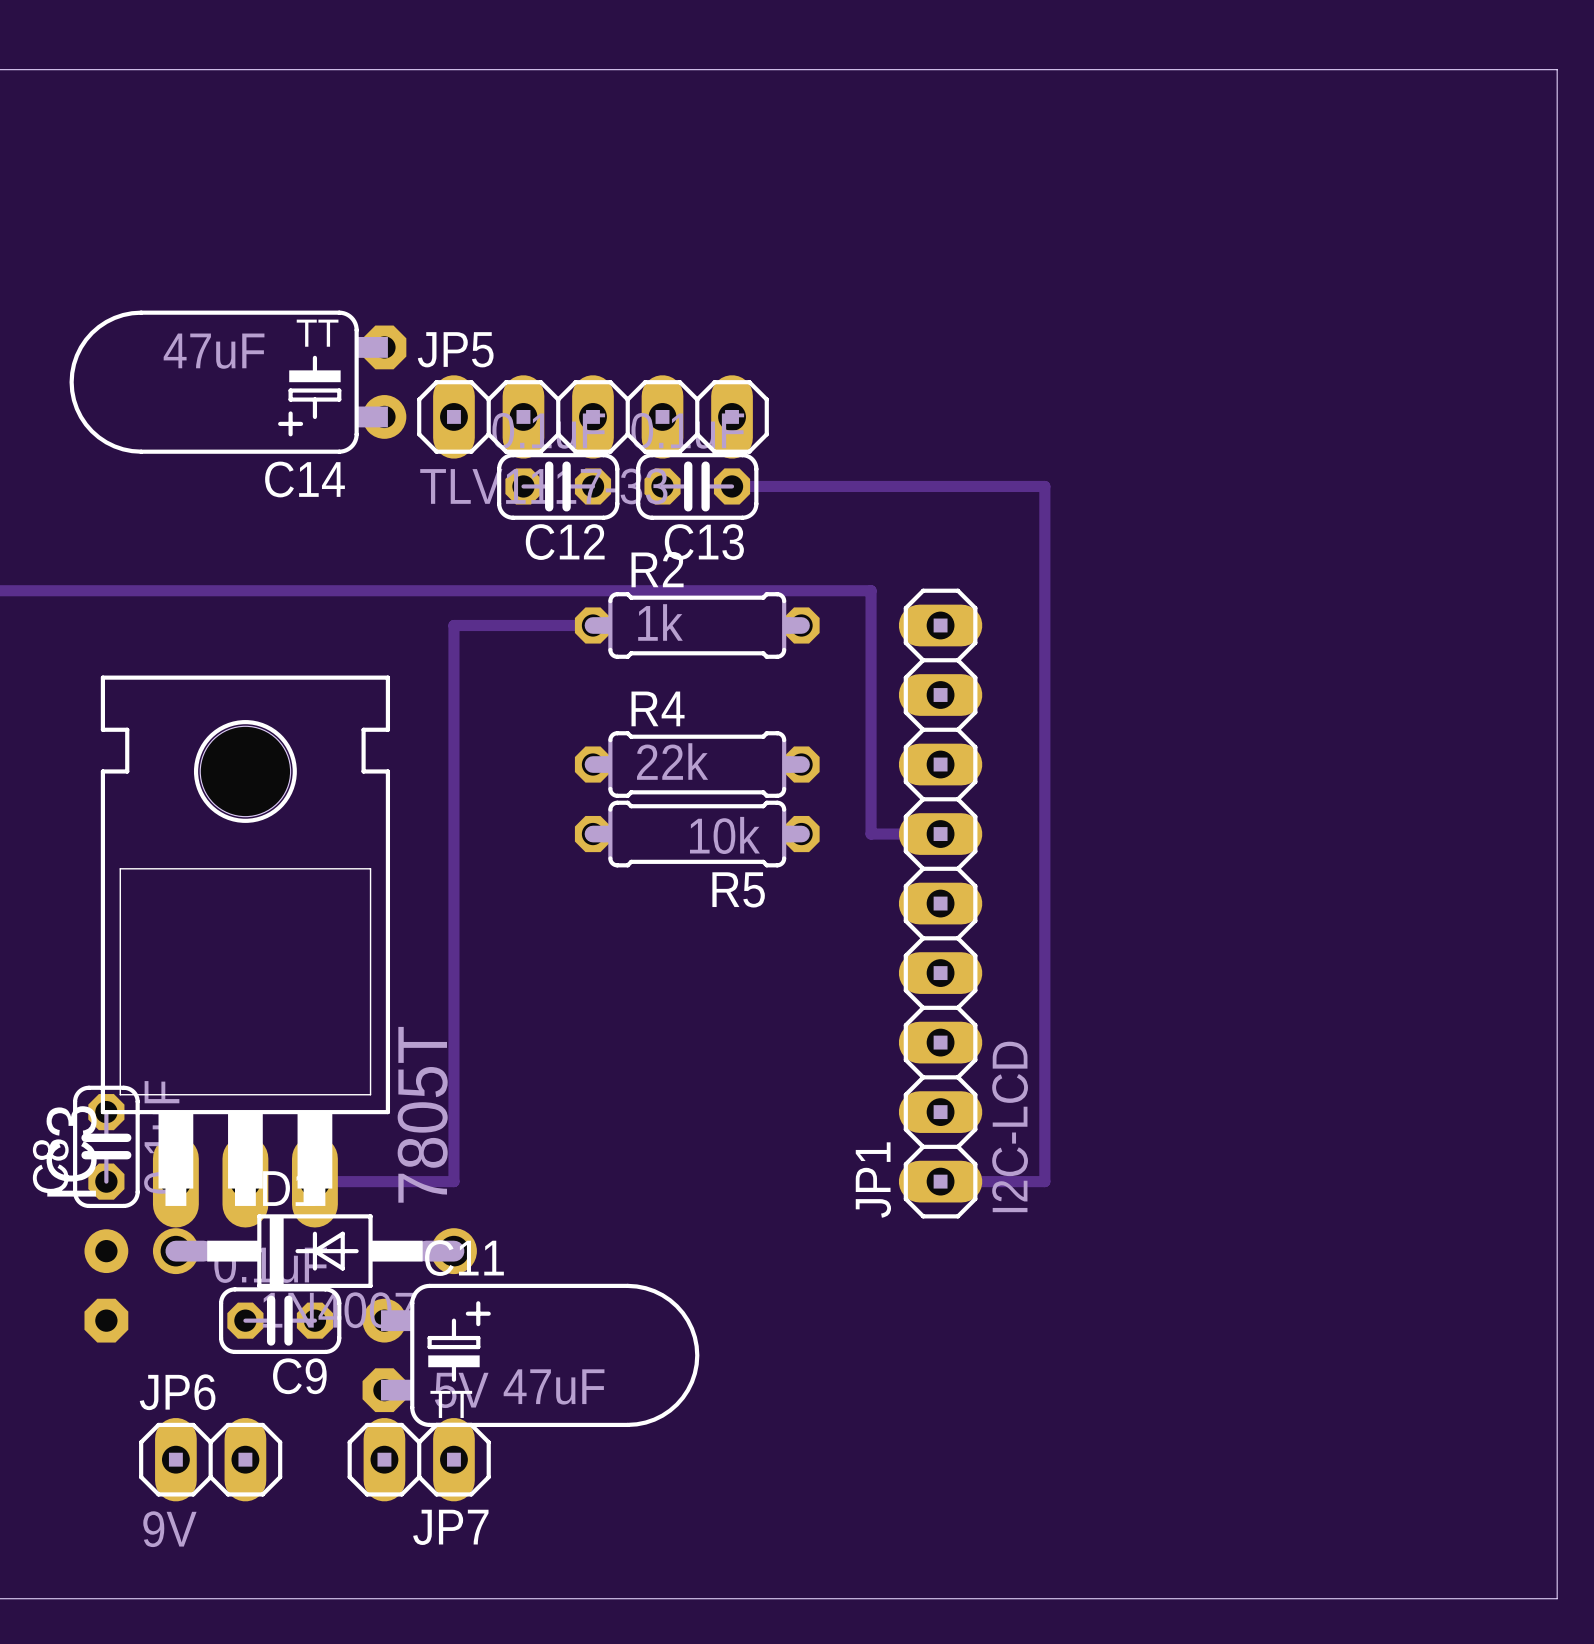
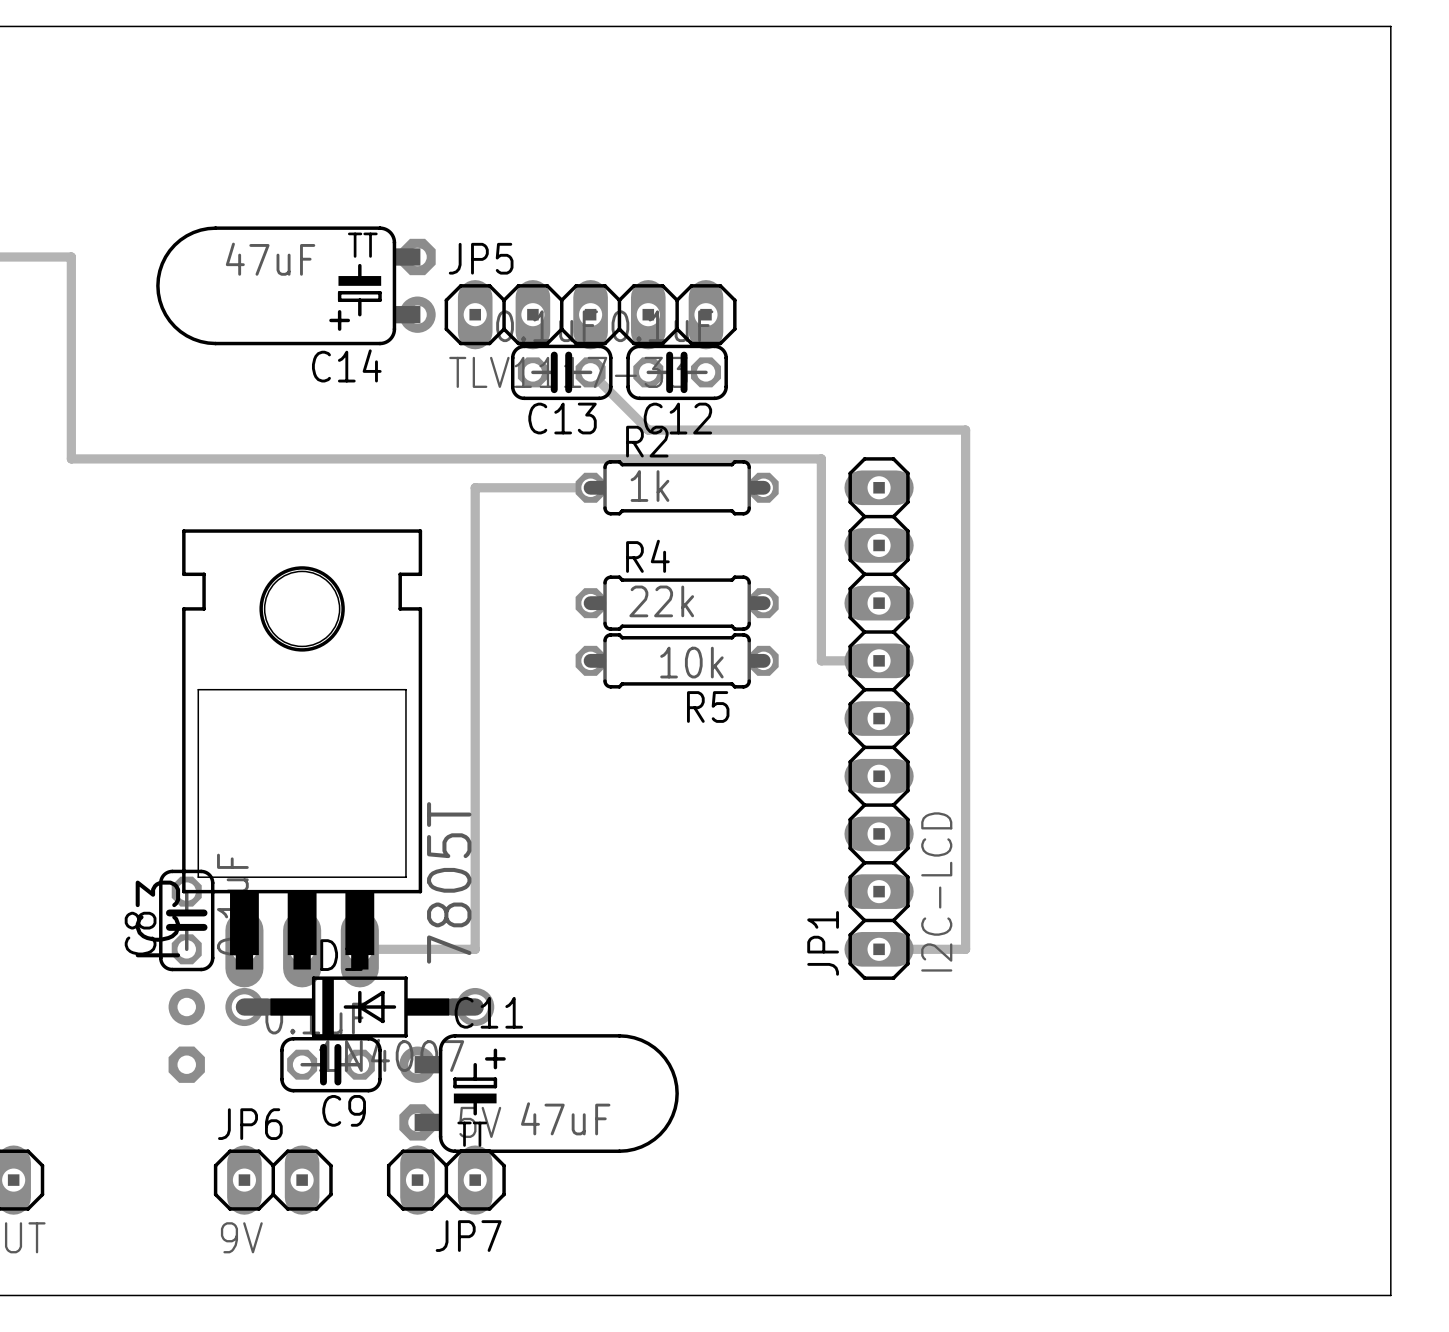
track: (732, 486) (1044, 486) (1044, 555) -> (590, 372) (648, 430) (965, 430)
C12 name: C12 (565, 542) -> C13 (562, 418)
C13 name: C13 (704, 542) -> C12 (677, 418)

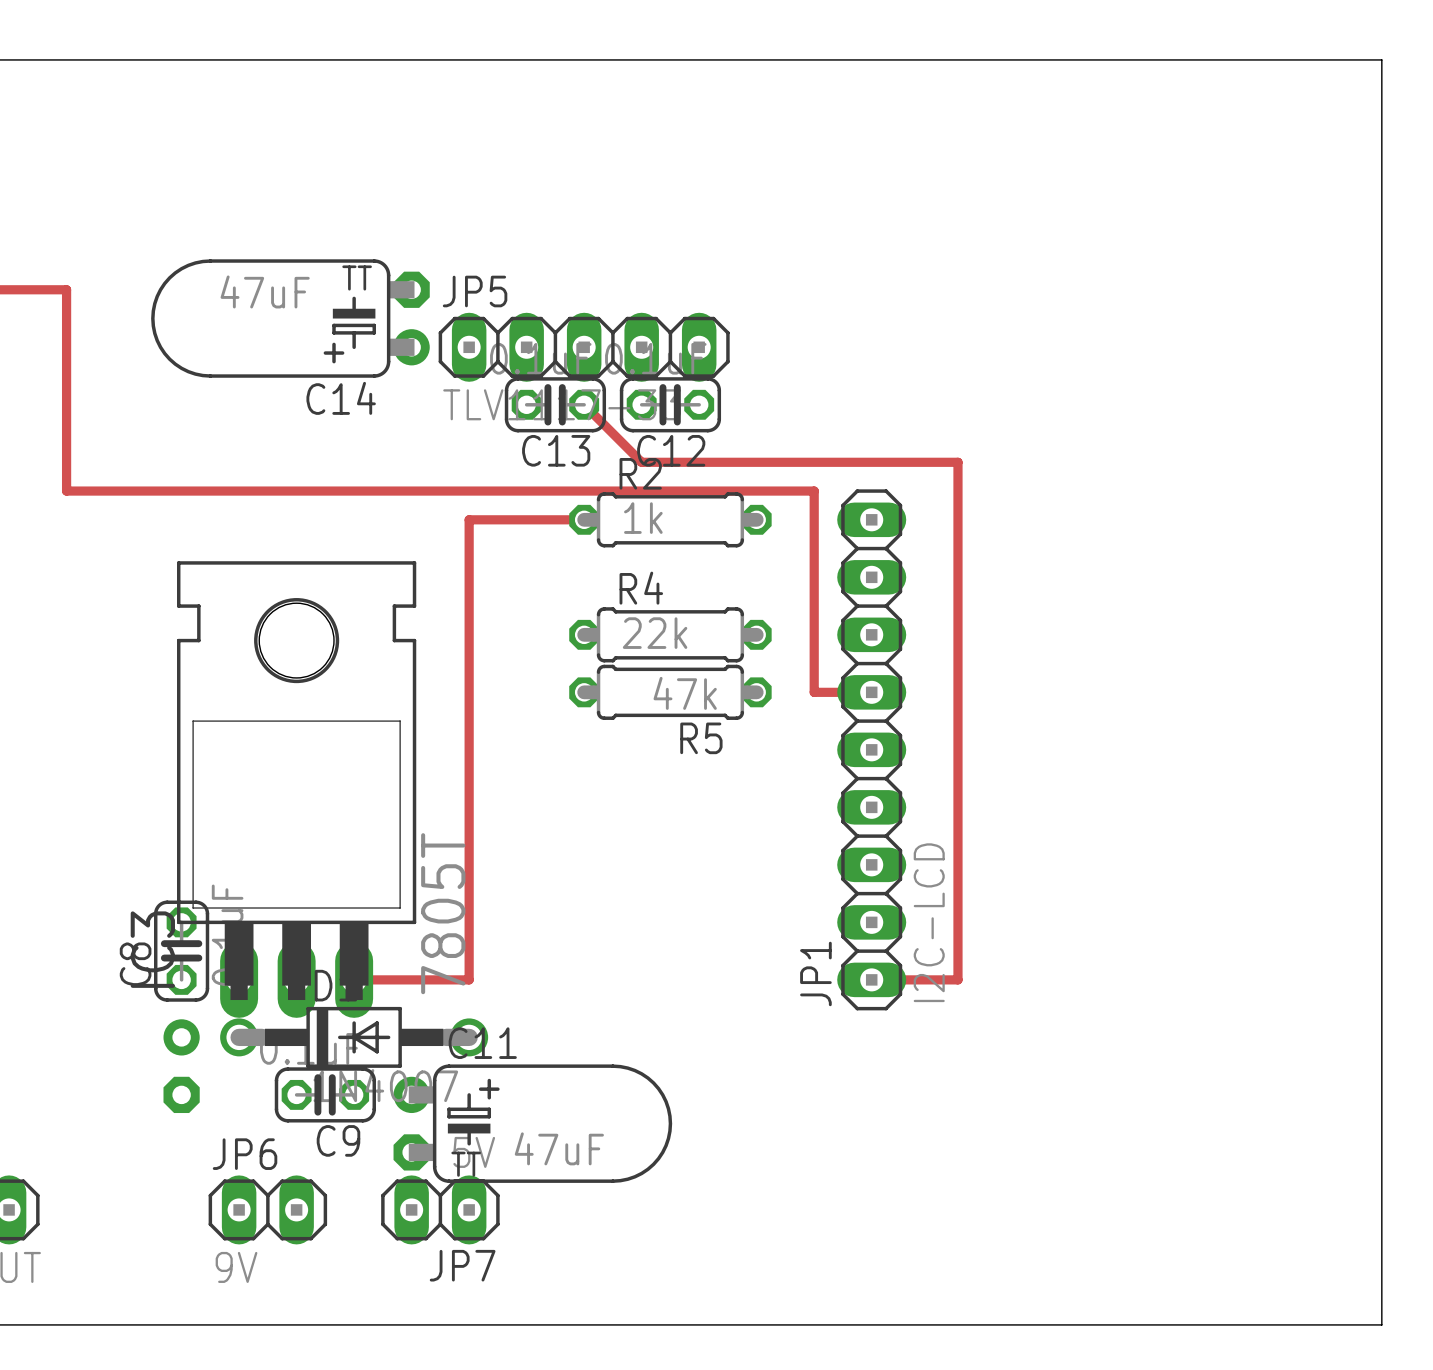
R5 value: 10k (691, 662) -> 47k (685, 693)

